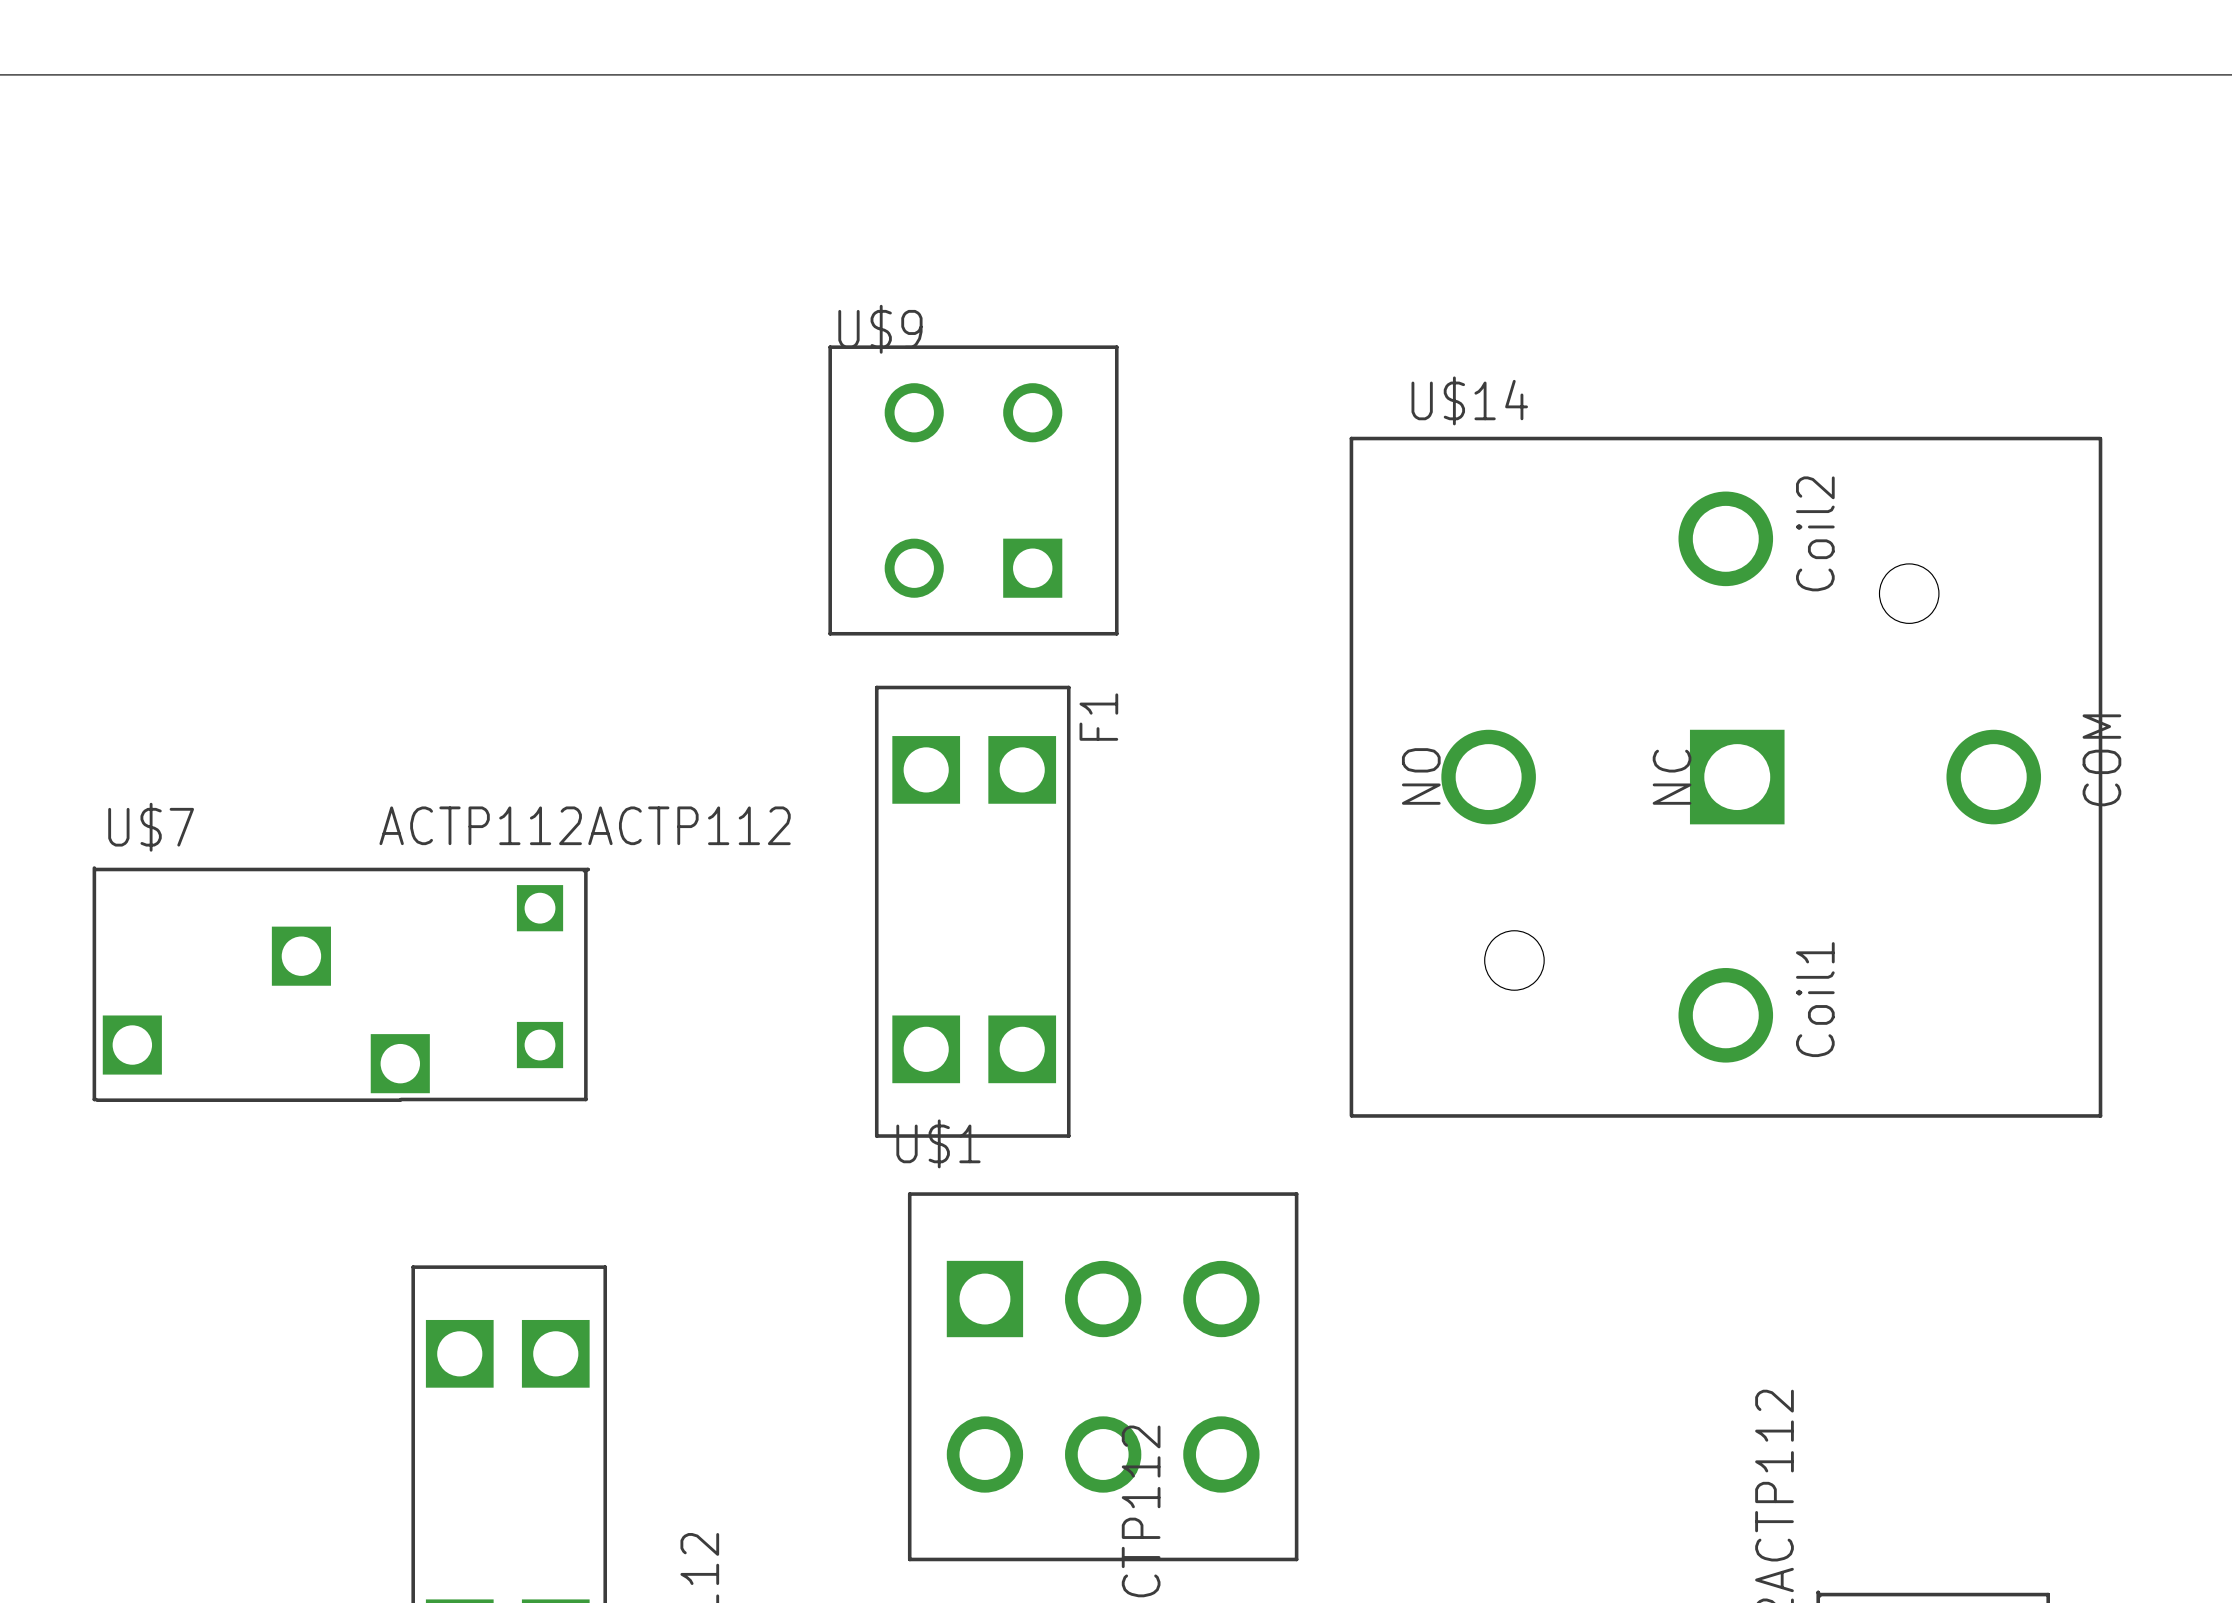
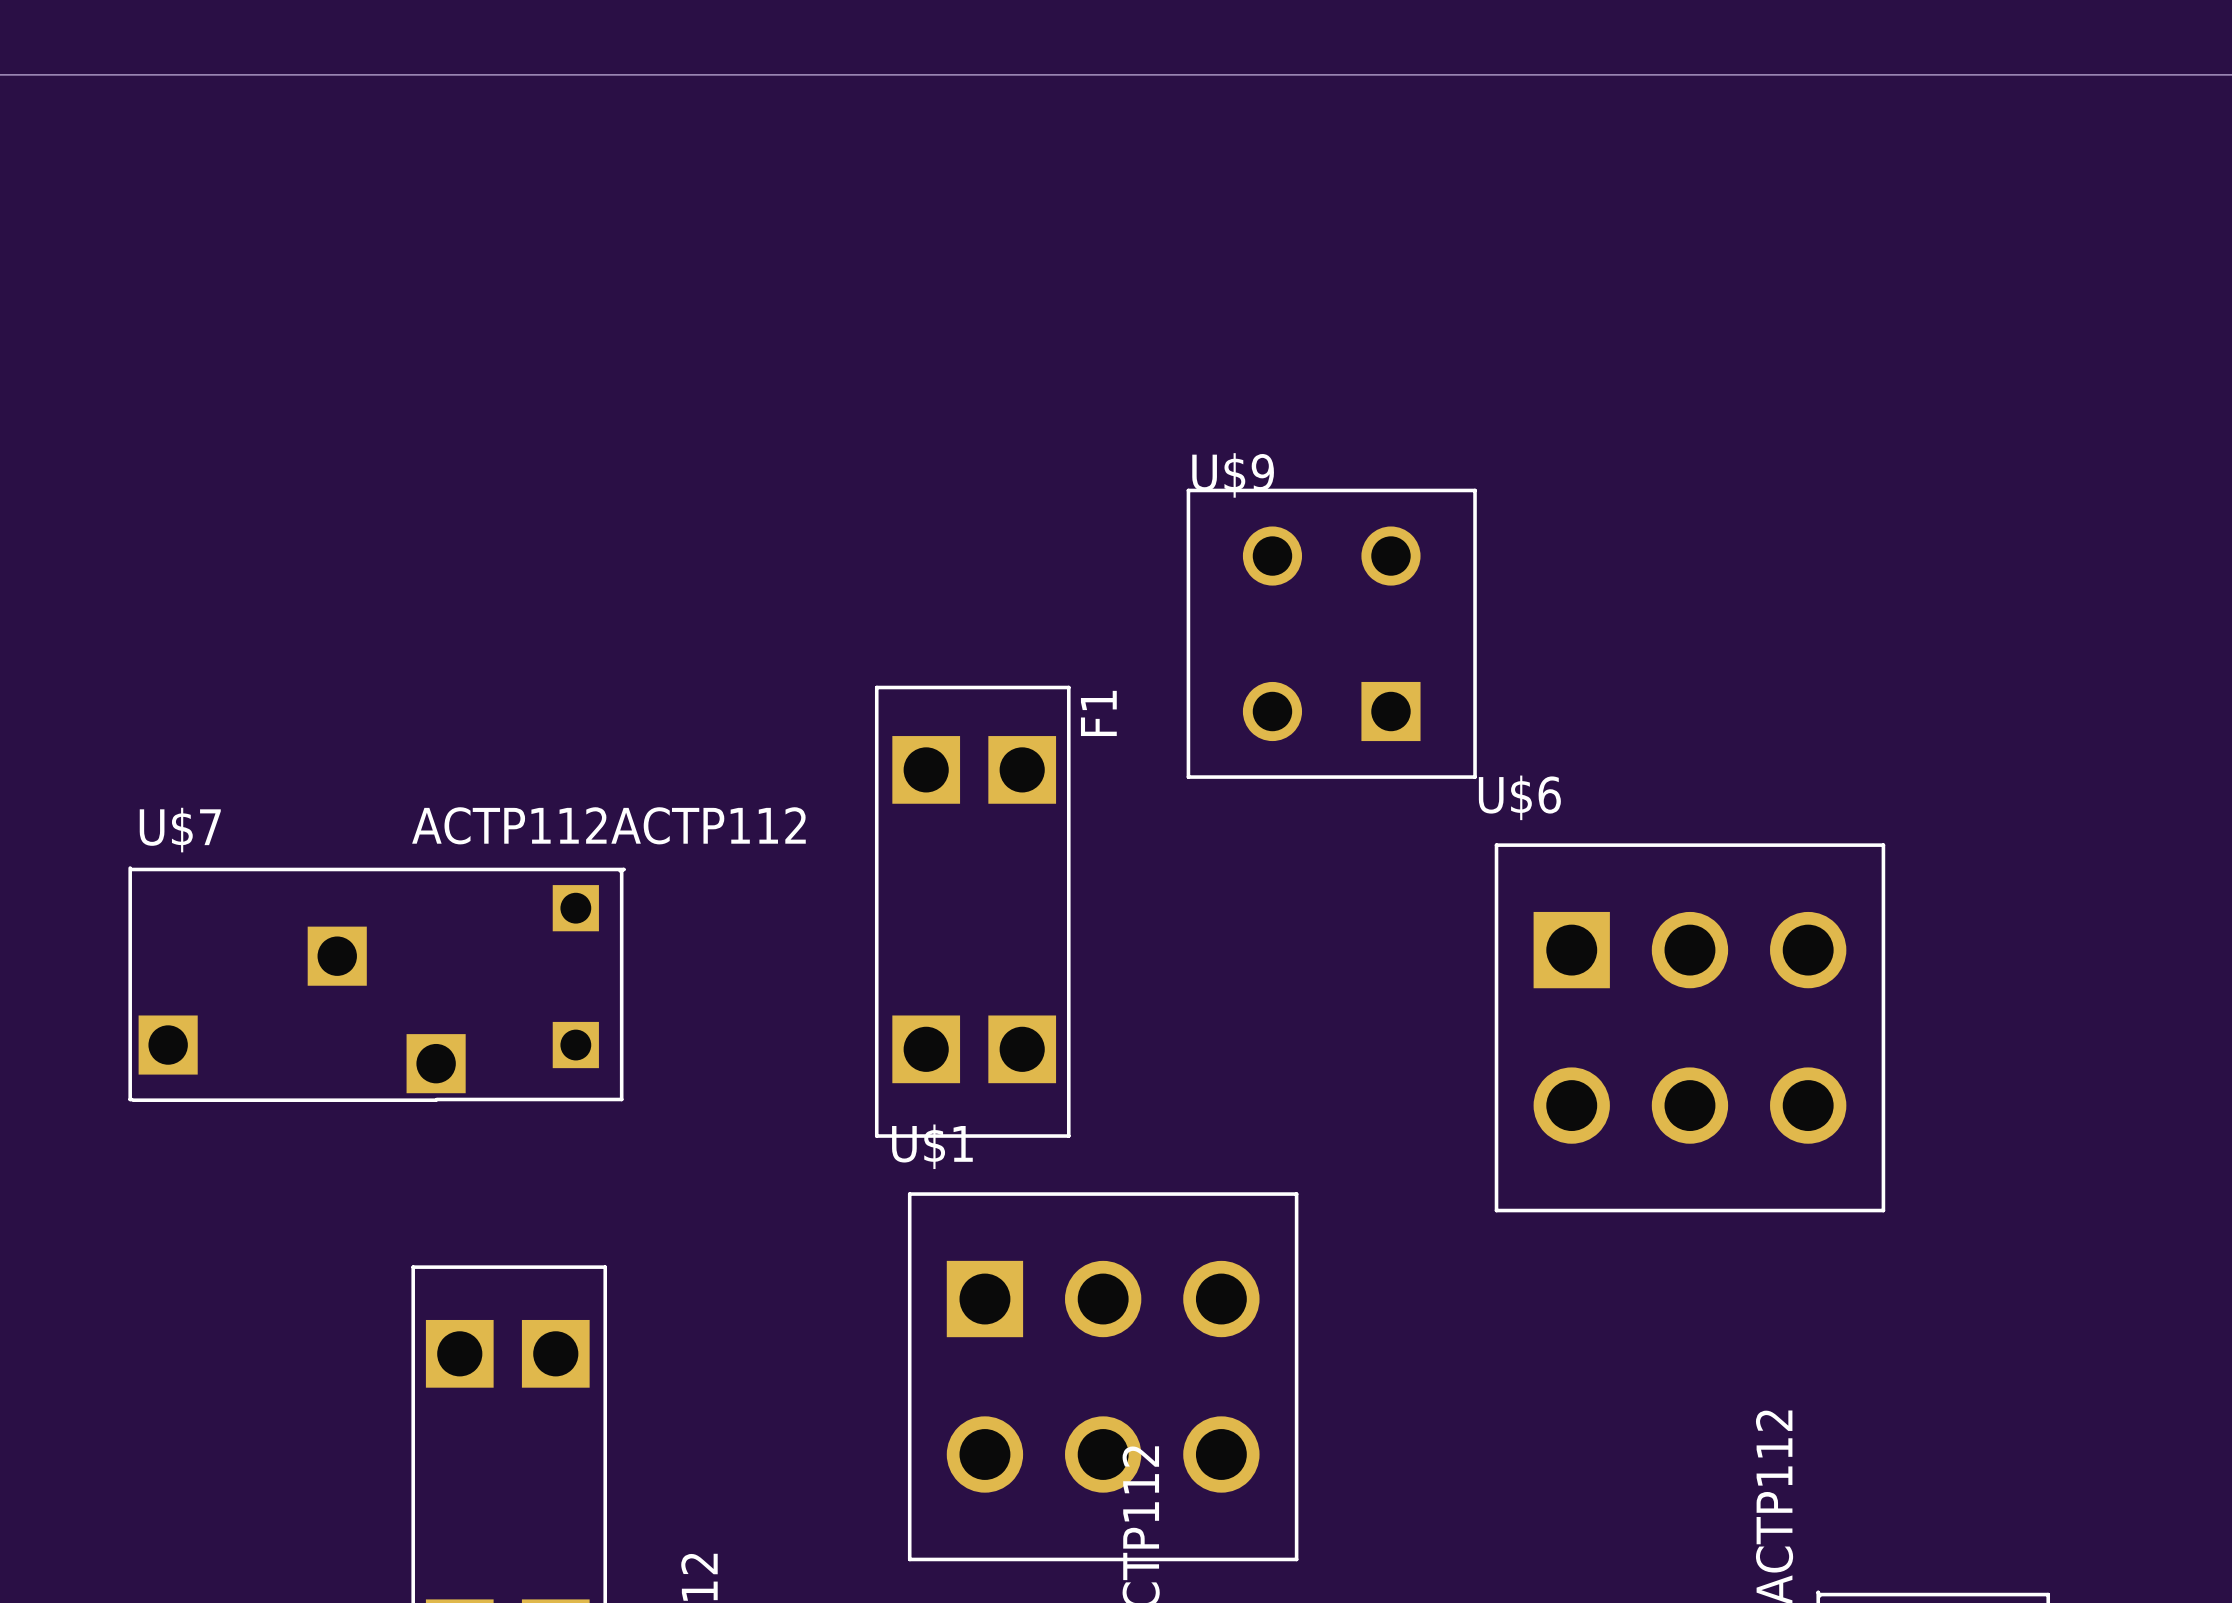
U$9 position: (973, 490) -> (1331, 633)
U$14: (1725, 777) -> none
U$7 position: (341, 984) -> (377, 984)
U$6: none -> (1689, 1027)

